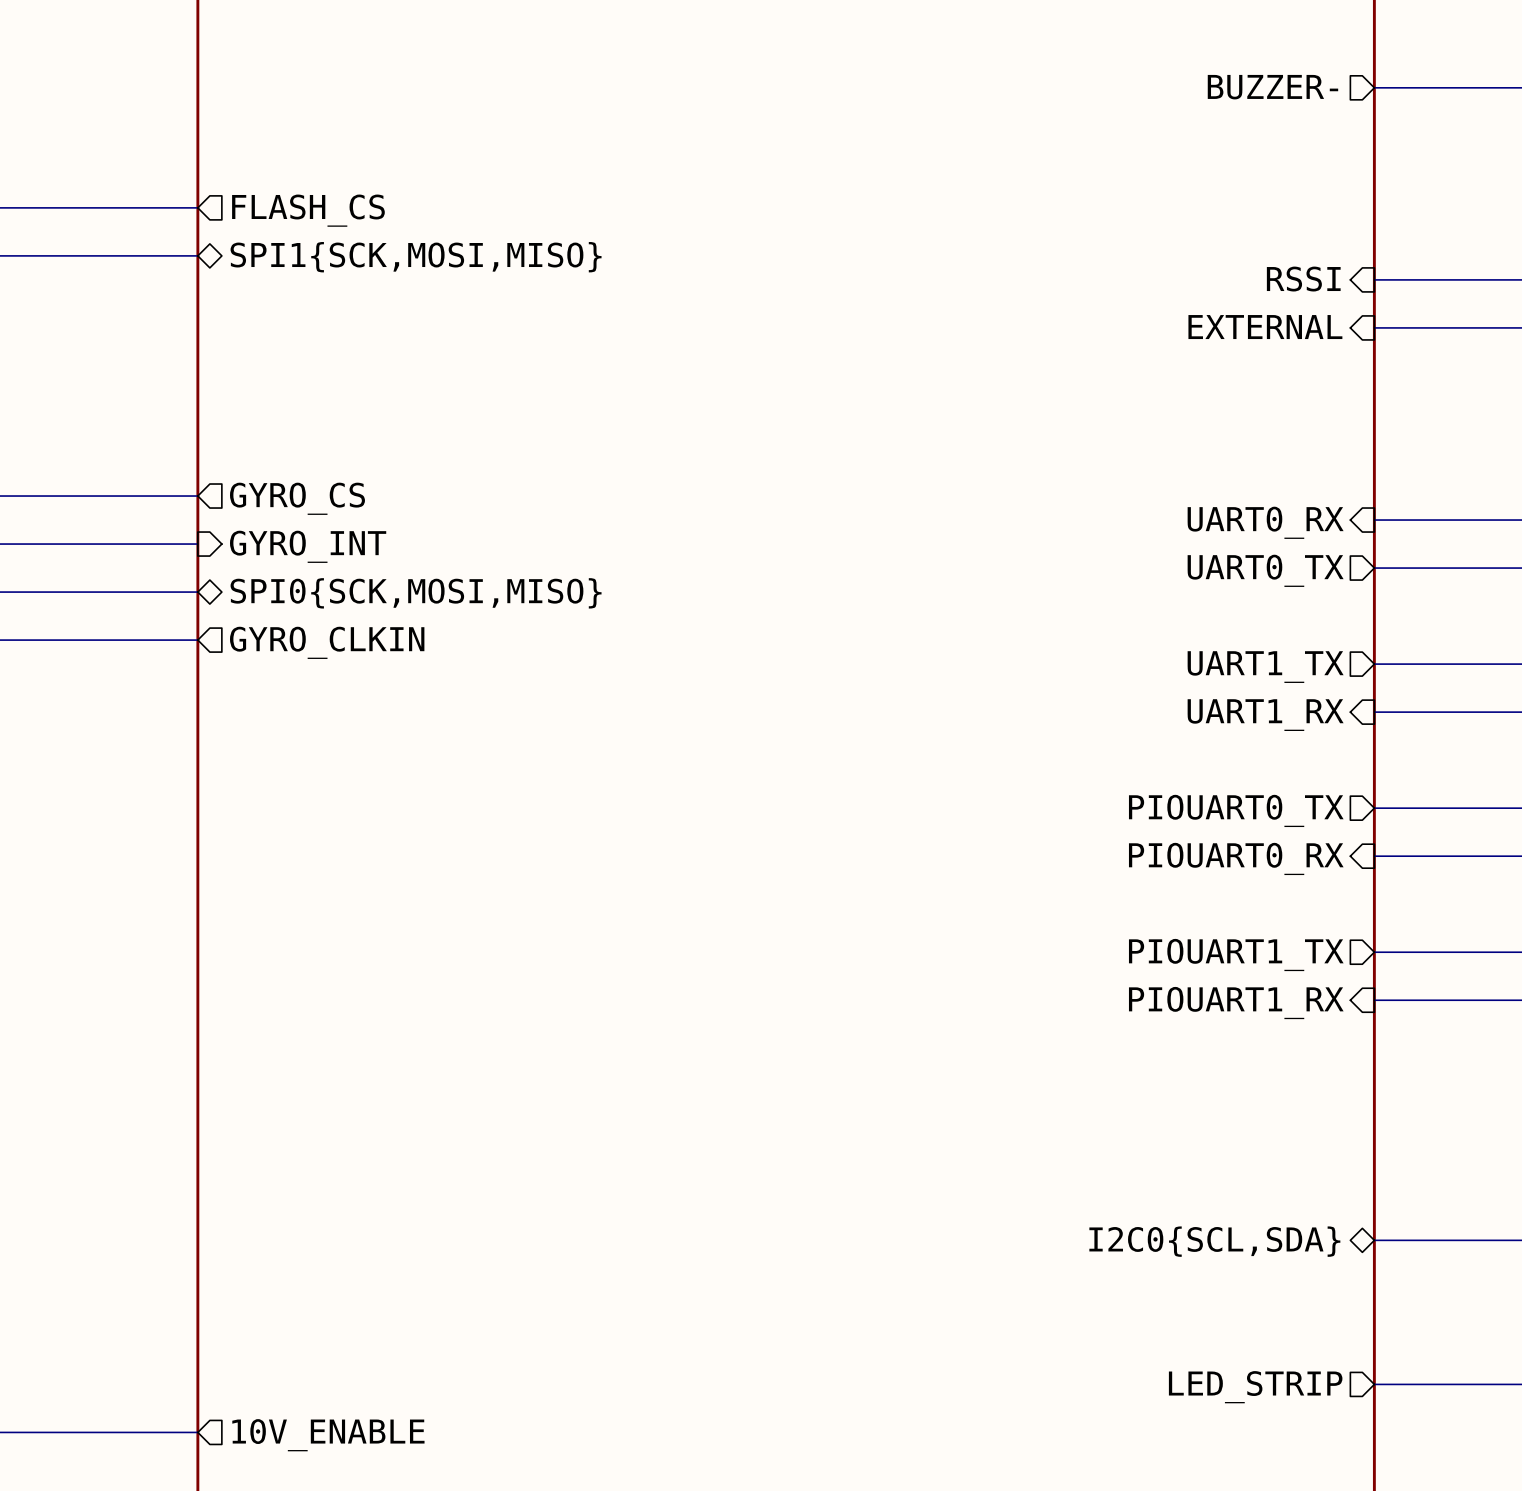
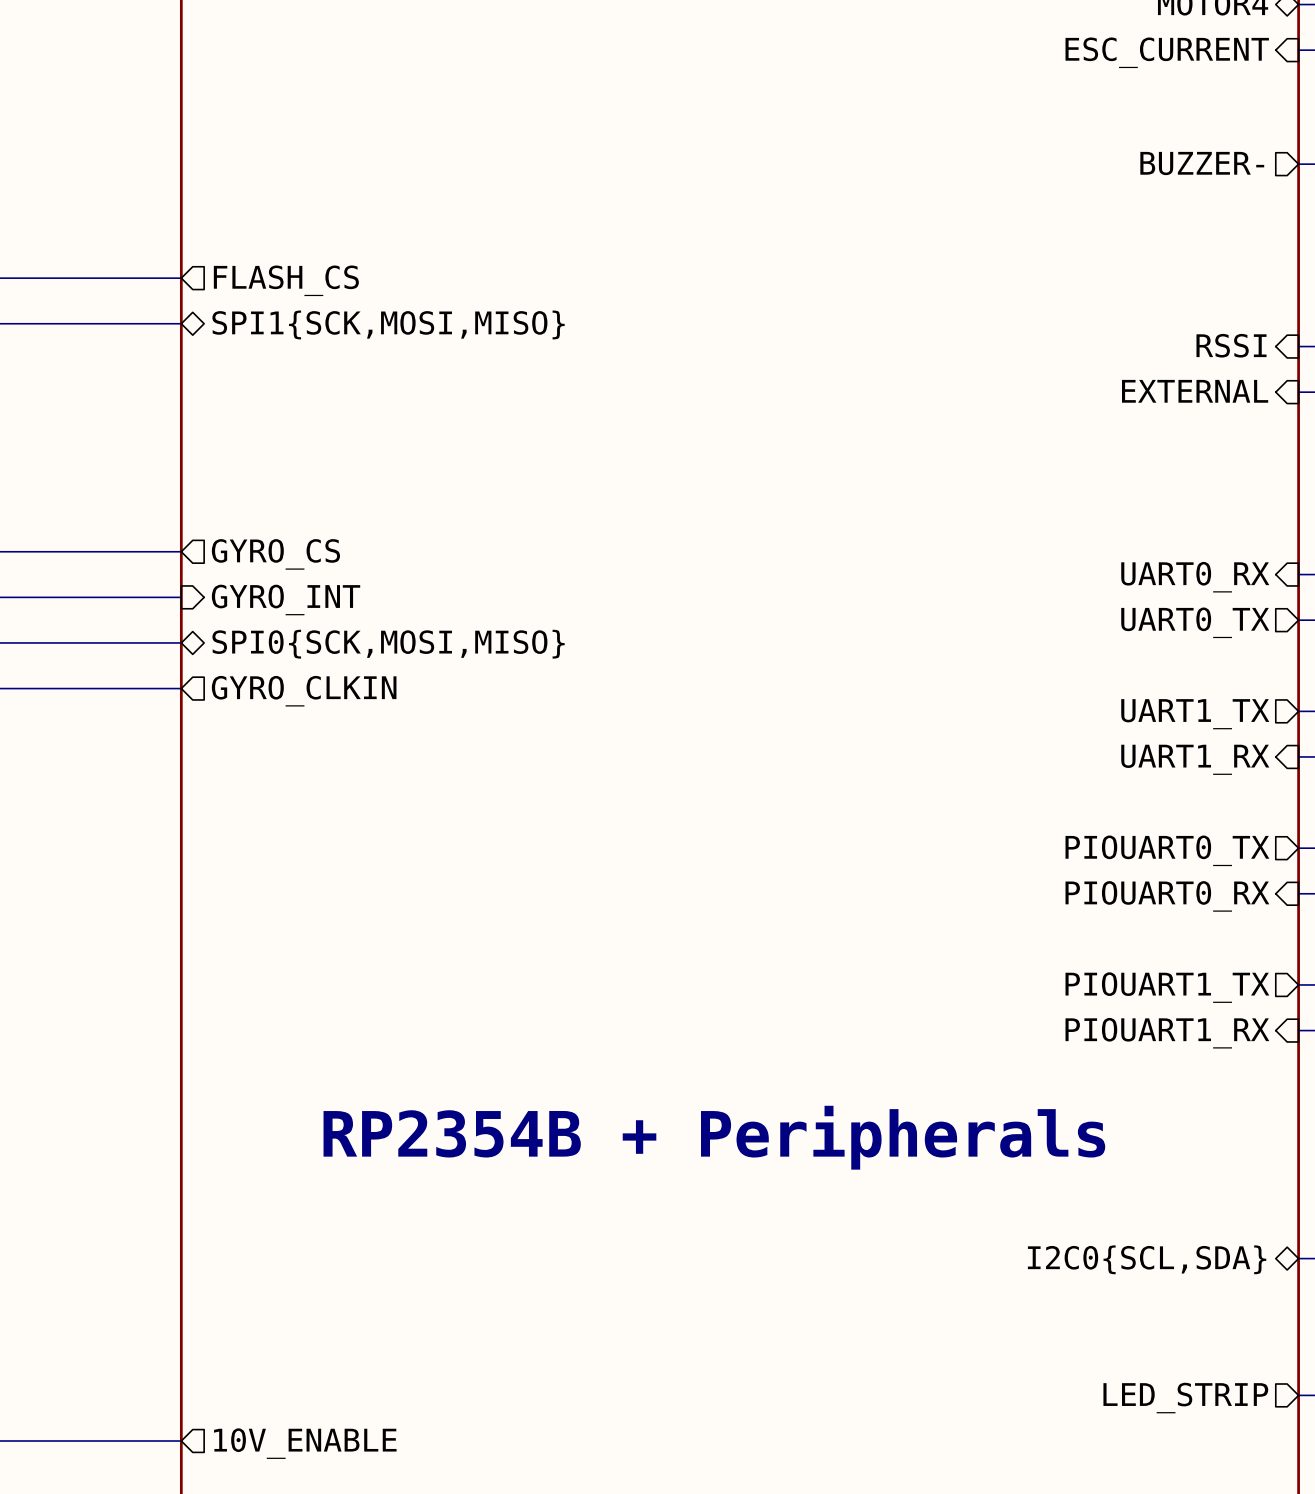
text: none -> RP2354B + Peripherals (714, 1137)

